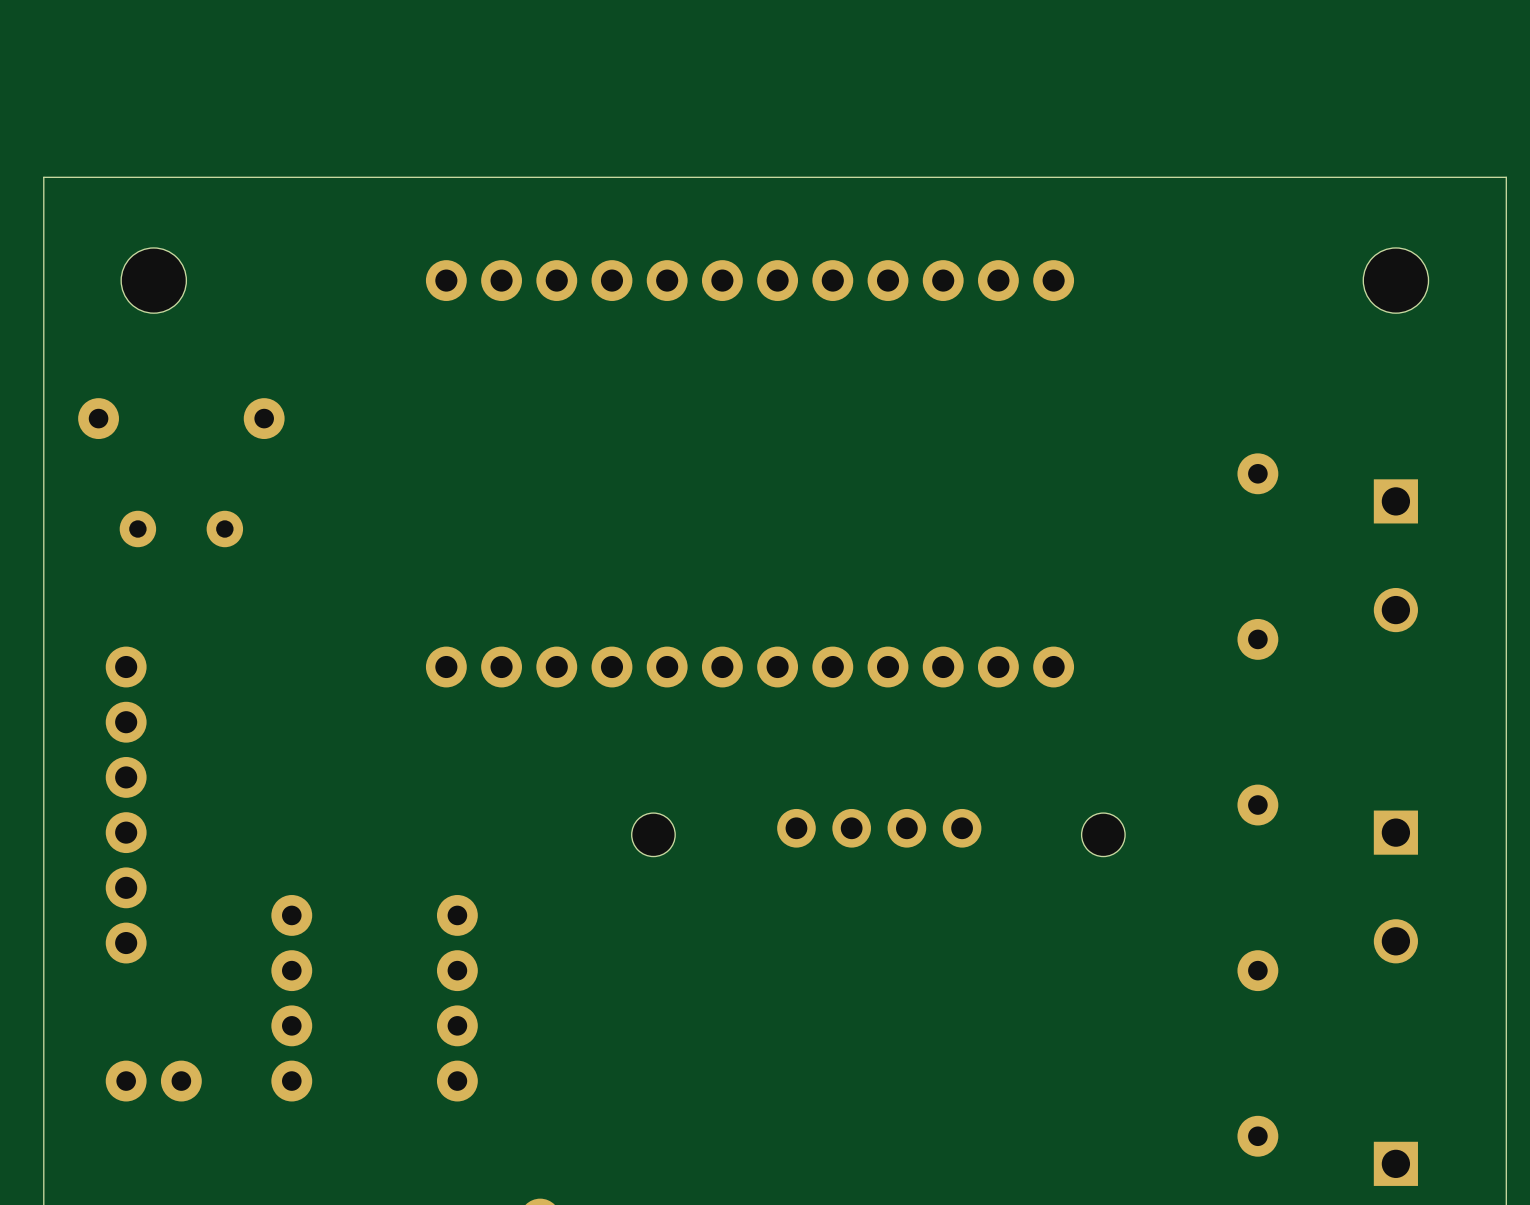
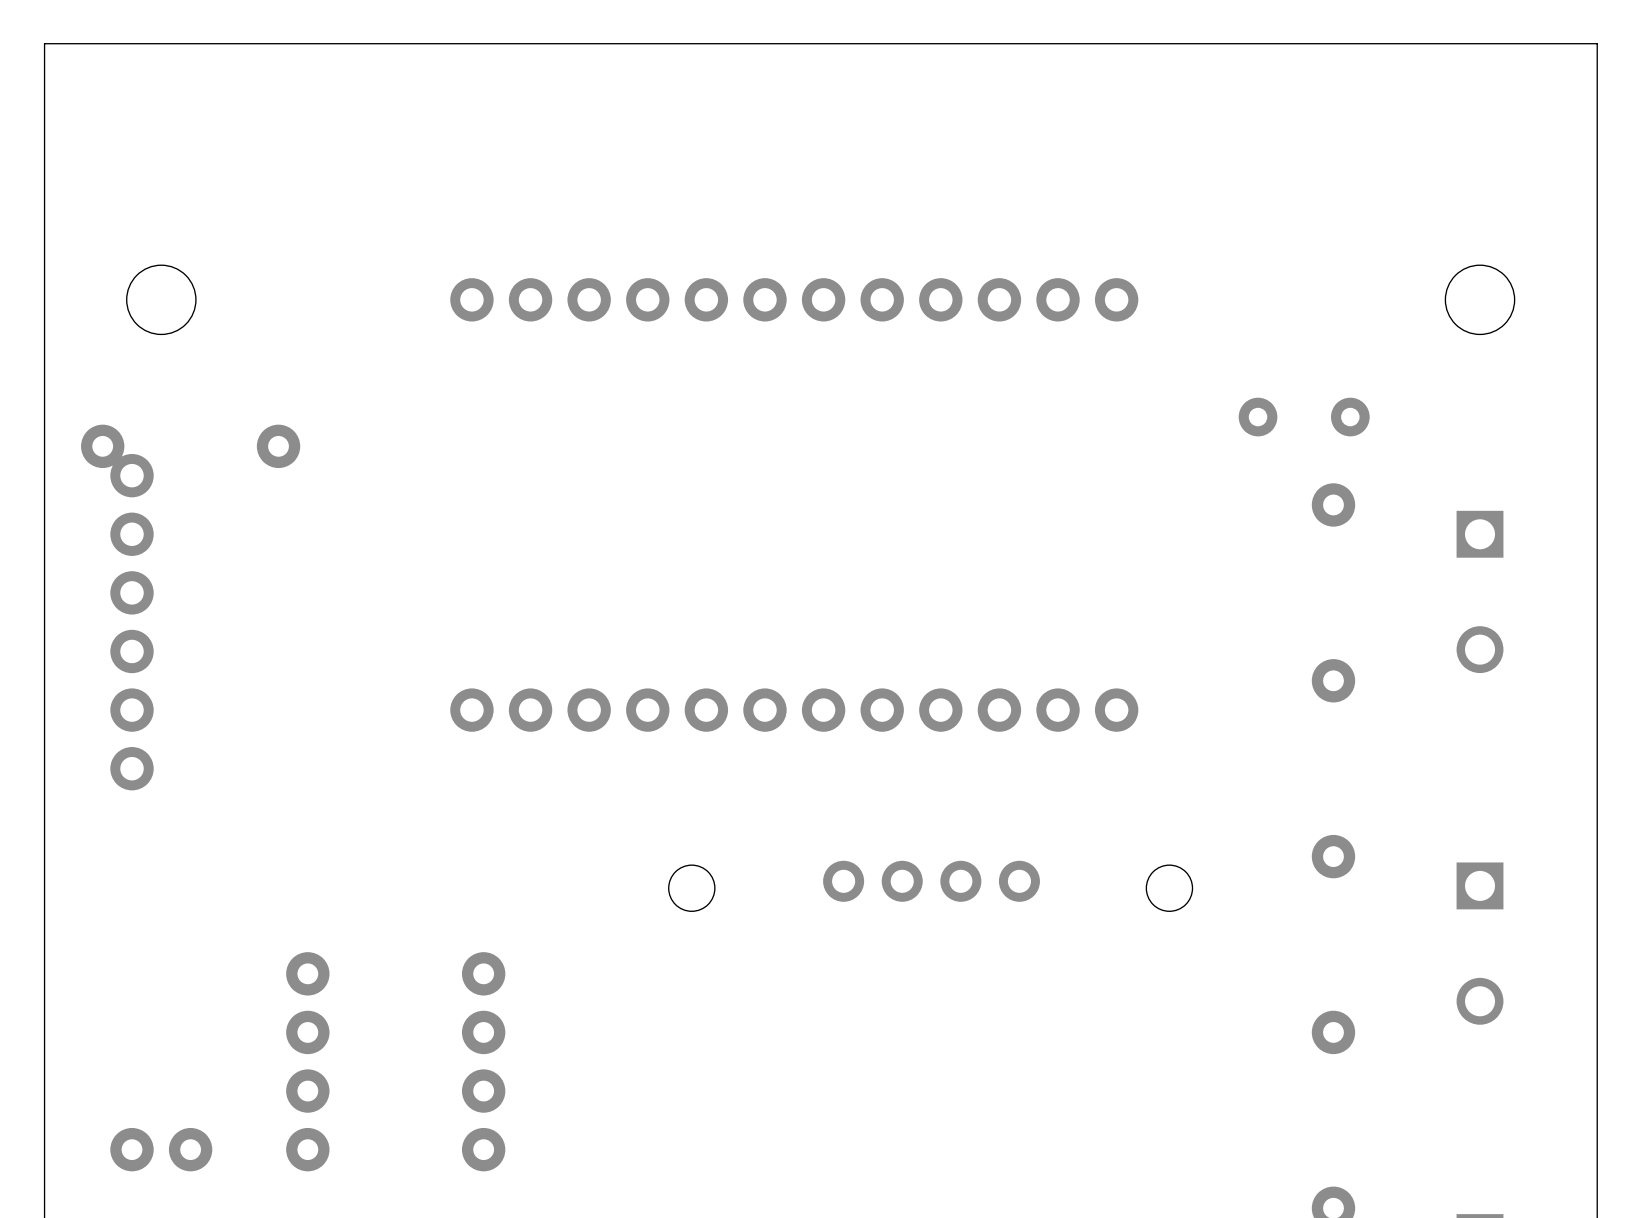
board edge: (1506, 177) (43, 177) -> (1597, 190) (1597, 43) (44, 43) (44, 190)
part: none -> (1304, 417)
part: (181, 528) -> none
part position: (126, 805) -> (132, 622)

